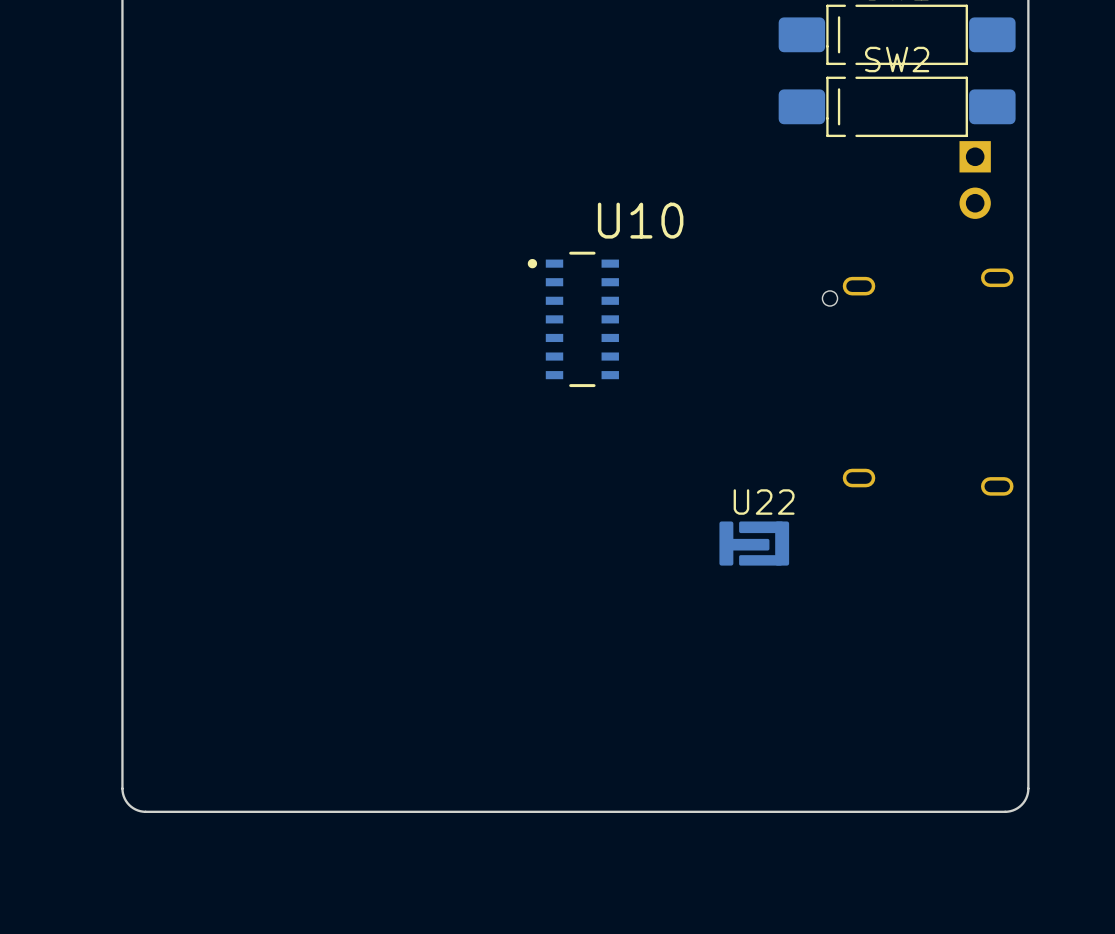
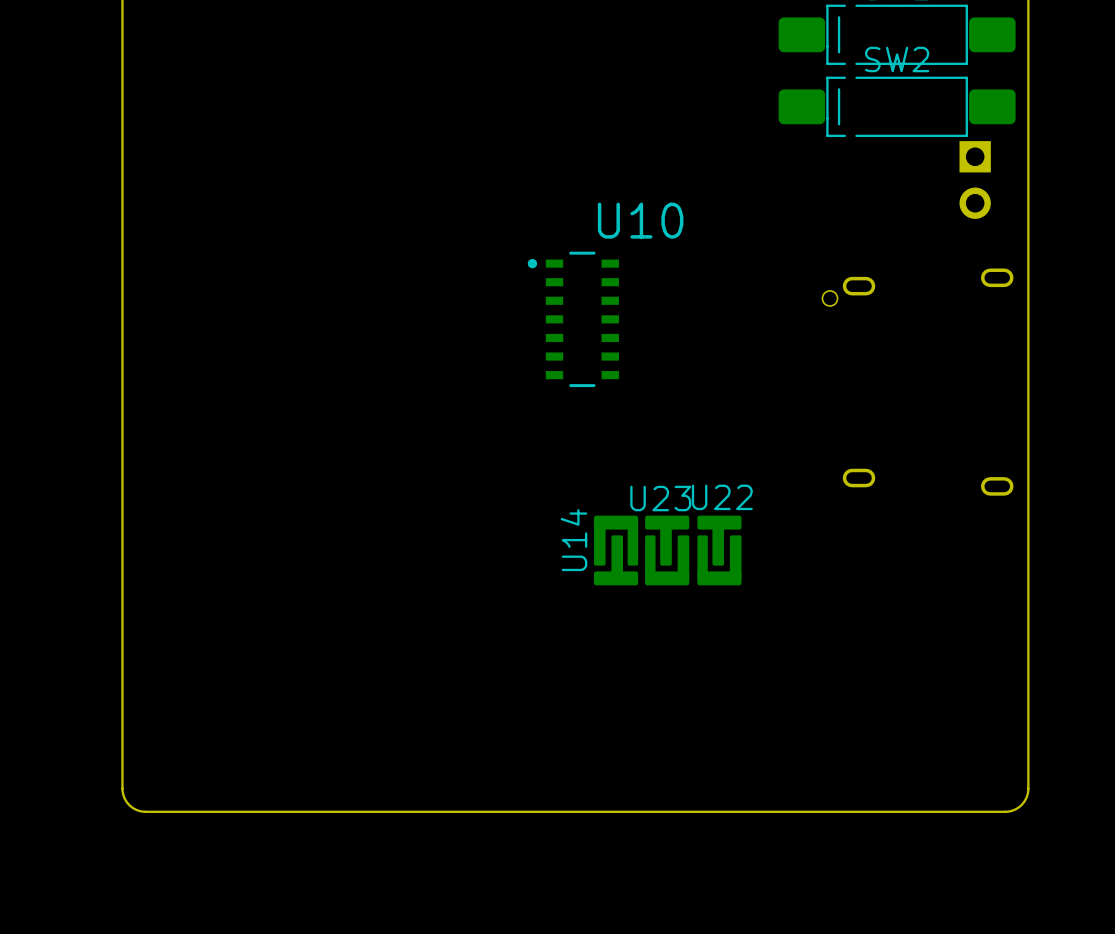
U22 rotation: 0° (754, 543) -> 90° clockwise (719, 550)
U14: none -> (616, 550)
U23: none -> (667, 550)

